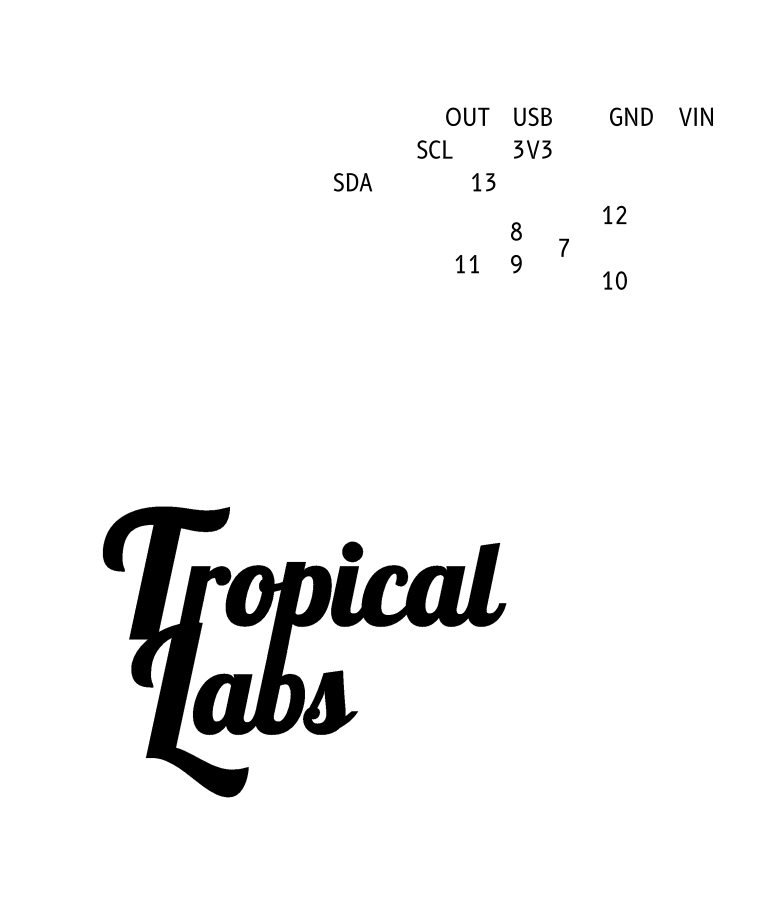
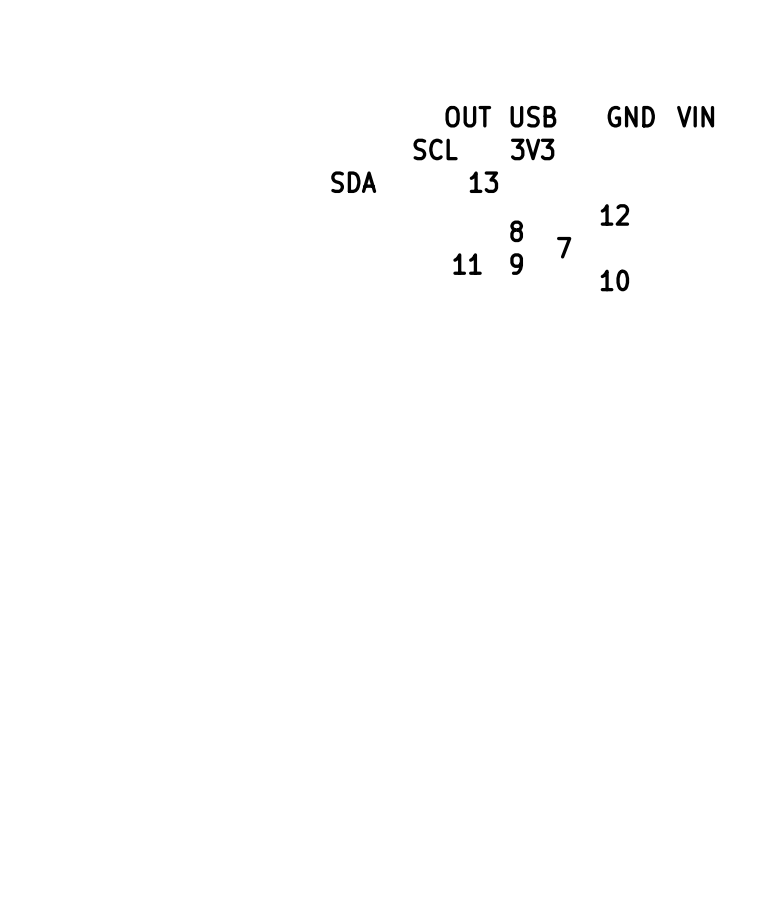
drawing: [102, 506, 507, 798] -> none

